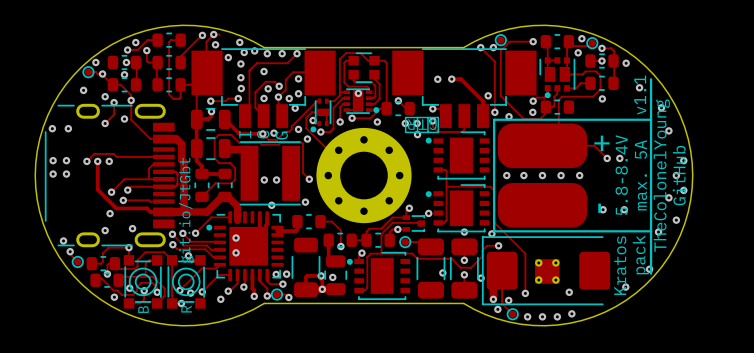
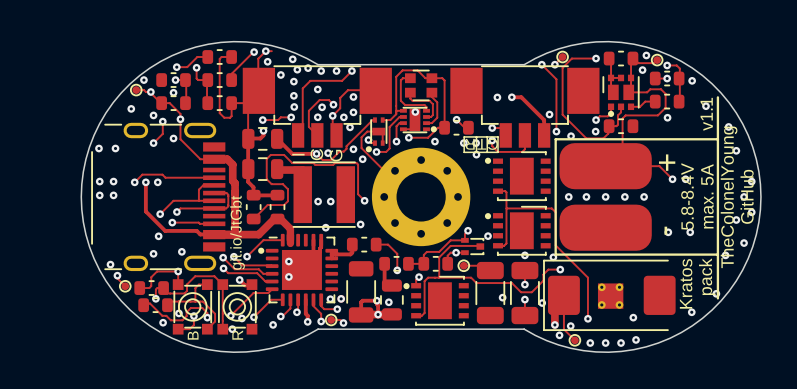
via: (135, 42) -> none

